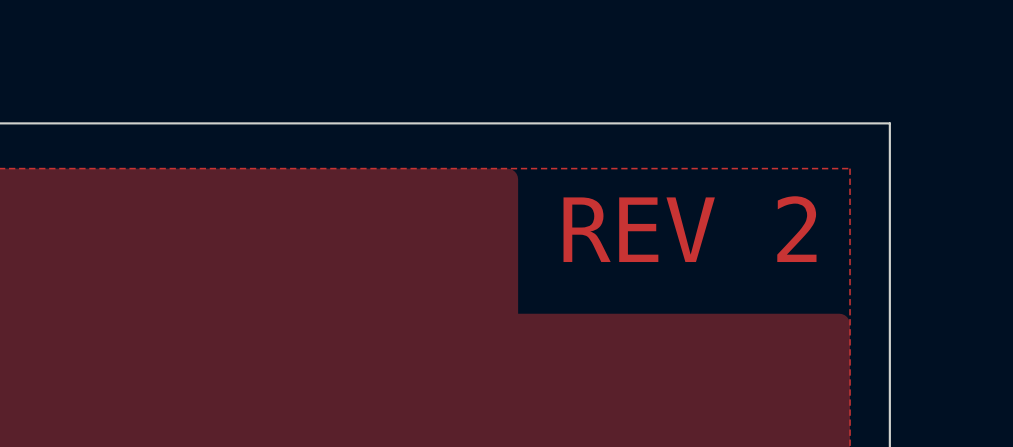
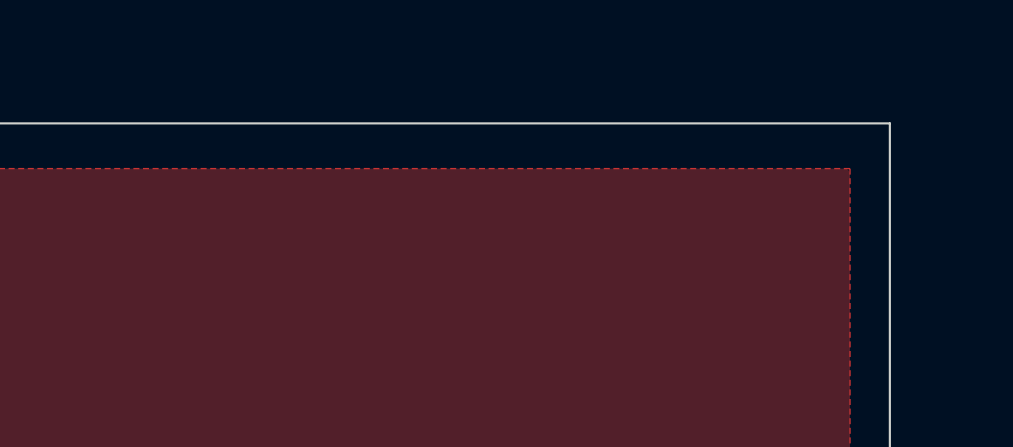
text: REV 2 (690, 229) -> none

